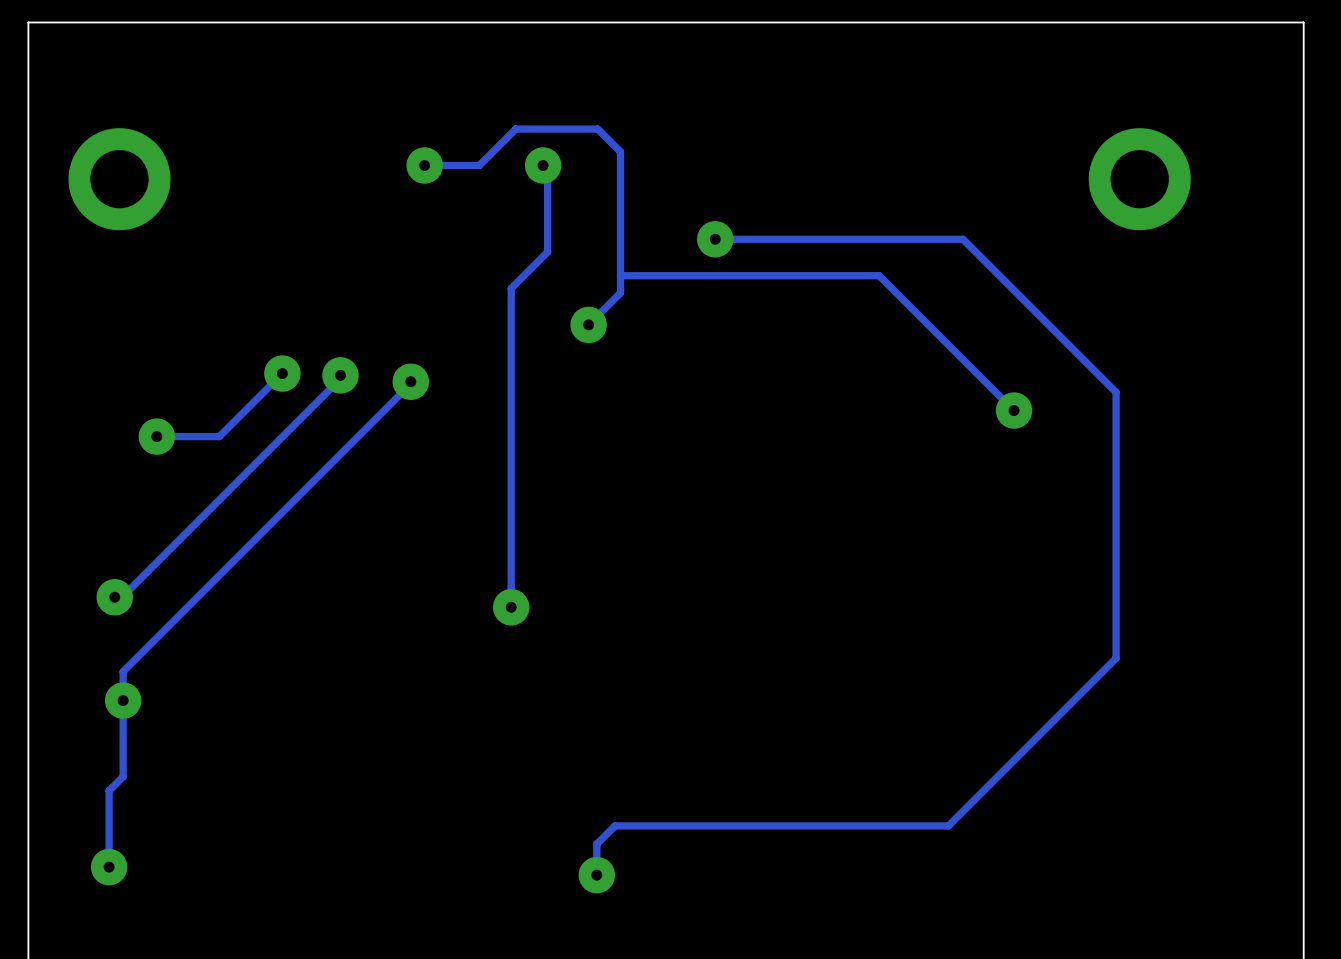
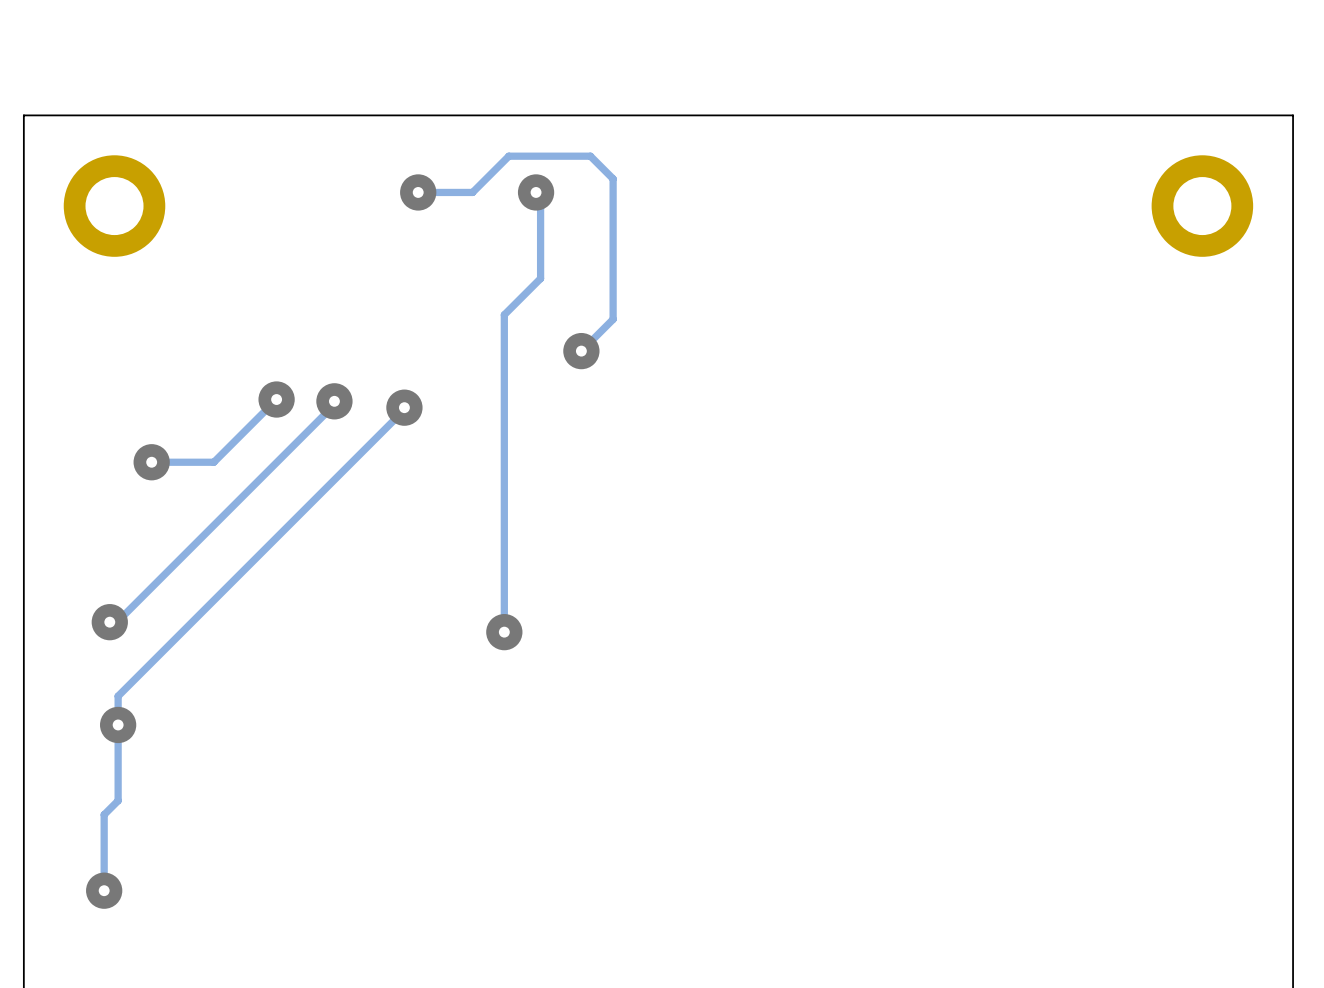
board edge: (1303, 88) (1303, 22) (28, 22) (28, 88) -> (1293, 115) (23, 115)
part position: (1139, 179) -> (1202, 206)
track: (715, 239) (963, 239) (1116, 392) (1116, 658) (948, 825) (615, 825) (596, 844) (596, 875) -> none
via: (715, 239) -> none
track: (620, 275) (879, 275) (1014, 410) -> none
via: (1014, 410) -> none
via: (596, 875) -> none

